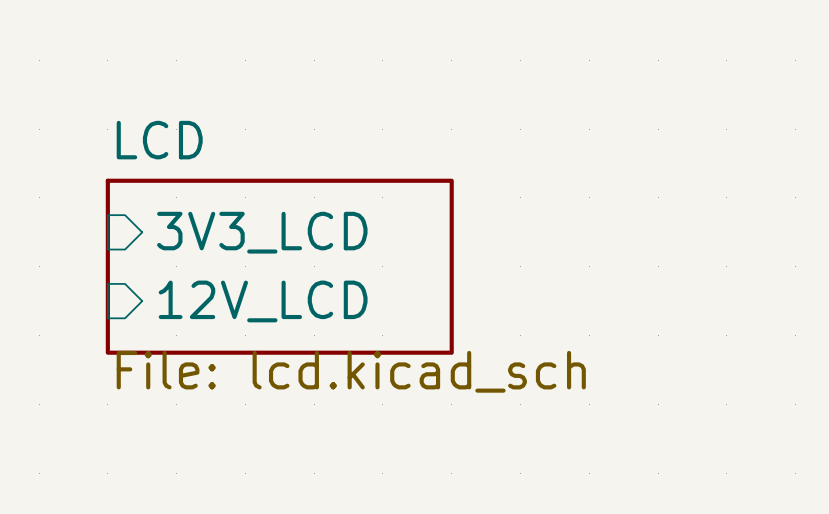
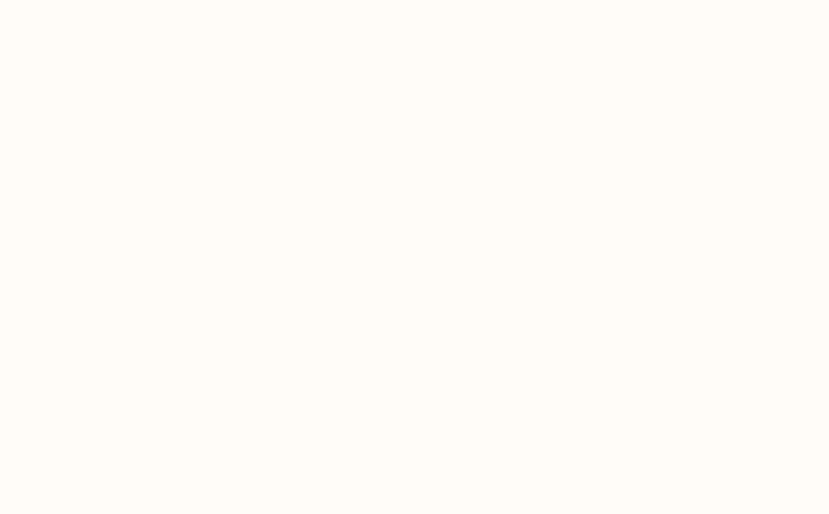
sheet pin: 3V3_LCD (262, 232) -> none
sheet LCD: File: lcd.kicad_sch (279, 266) -> none
sheet pin: 12V_LCD (263, 301) -> none

